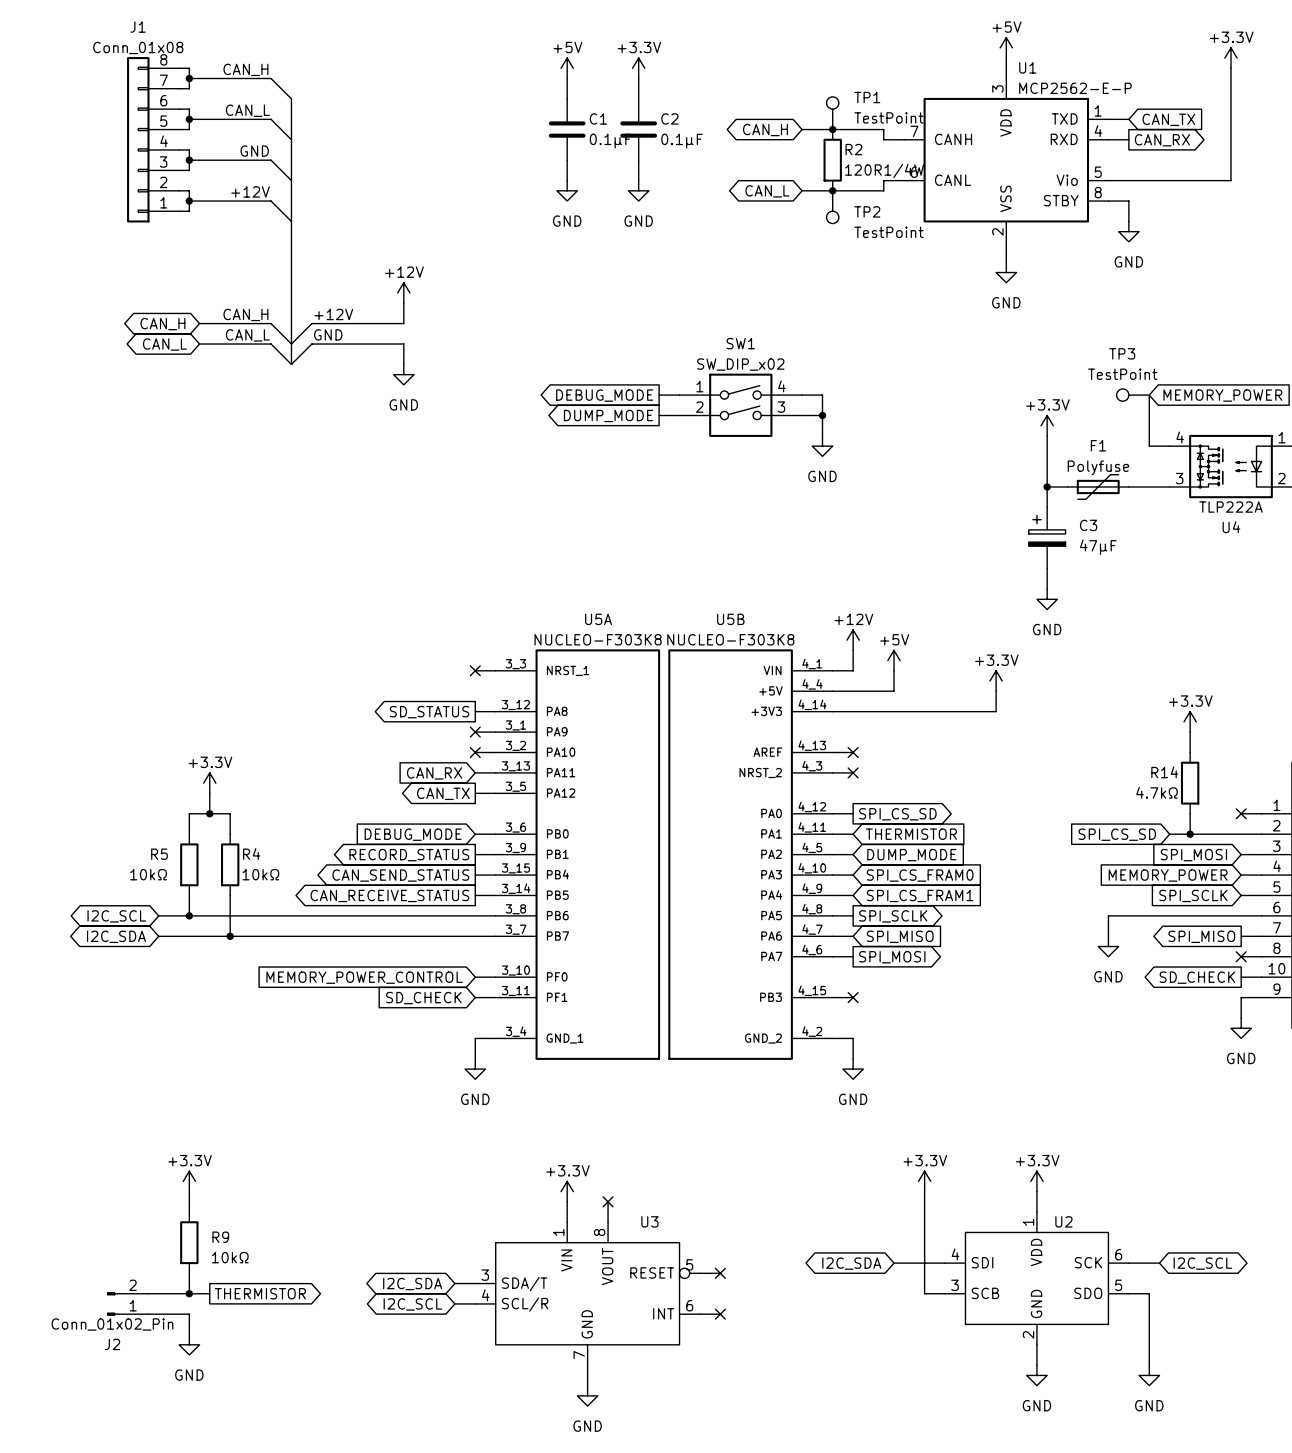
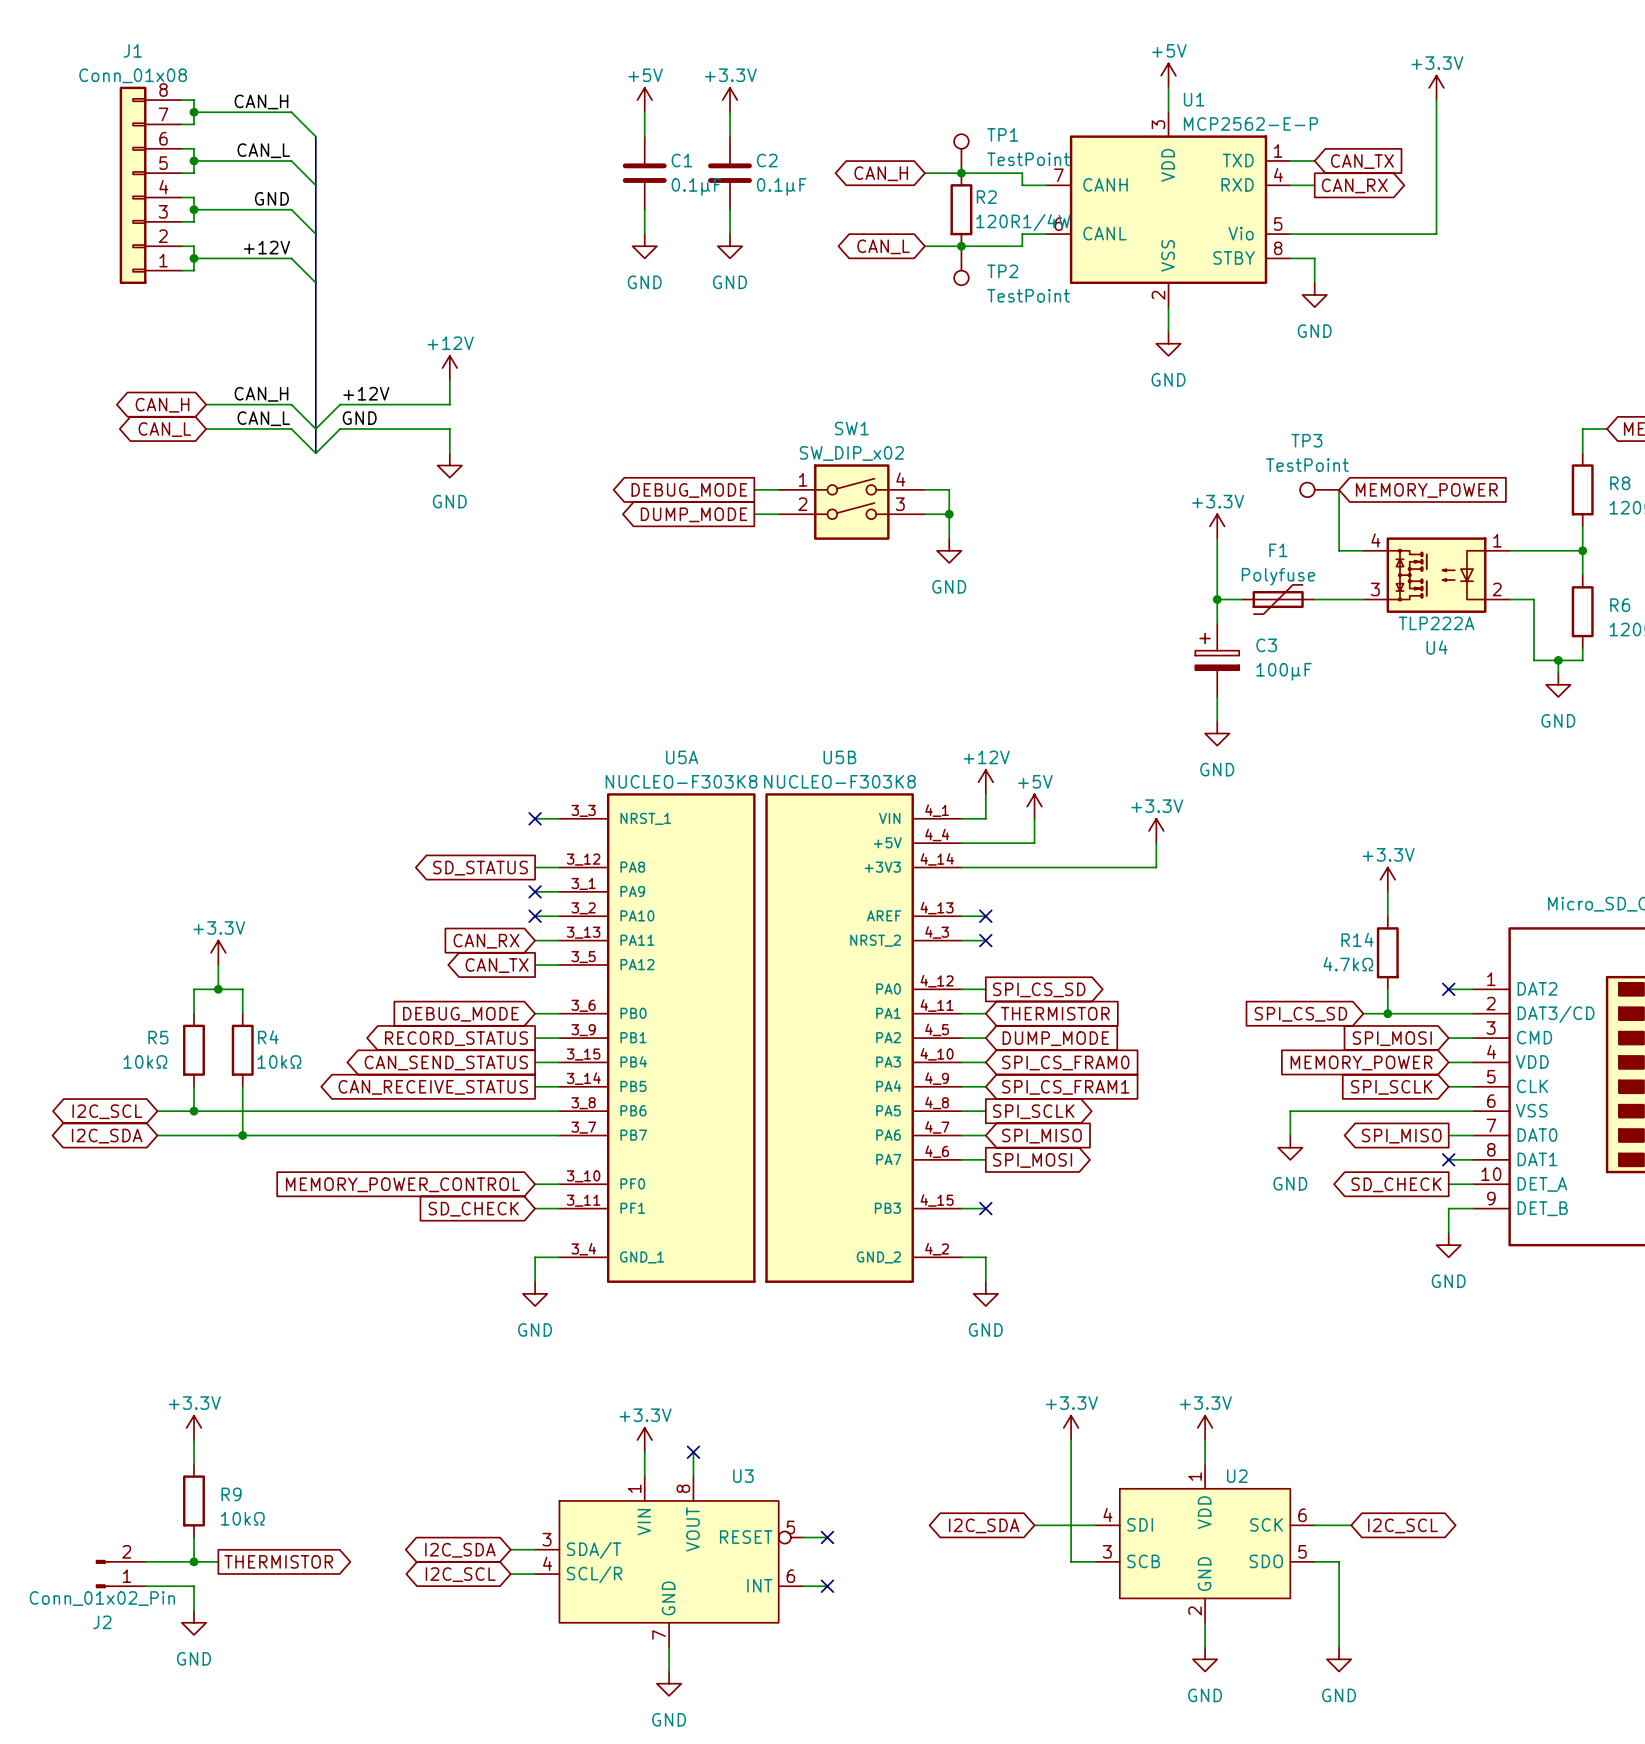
C3 value: 47μF (1098, 547) -> 100μF (1284, 671)

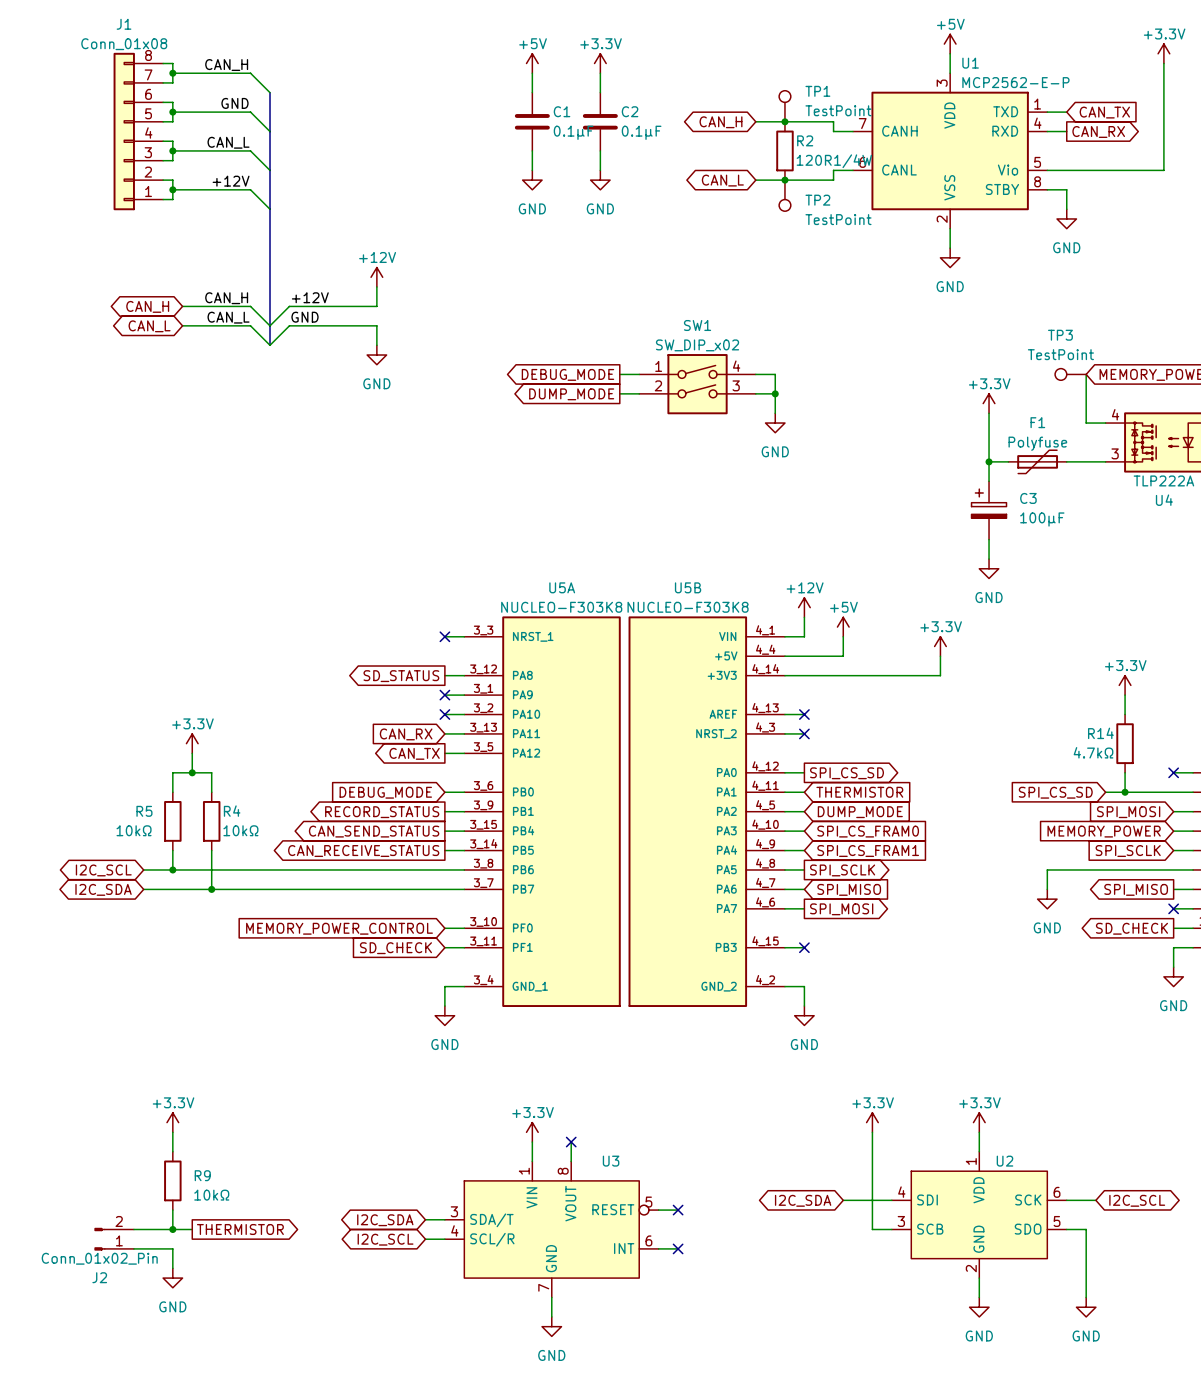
label: CAN_L (263, 150) -> GND (234, 103)
label: GND (271, 198) -> CAN_L (228, 142)

